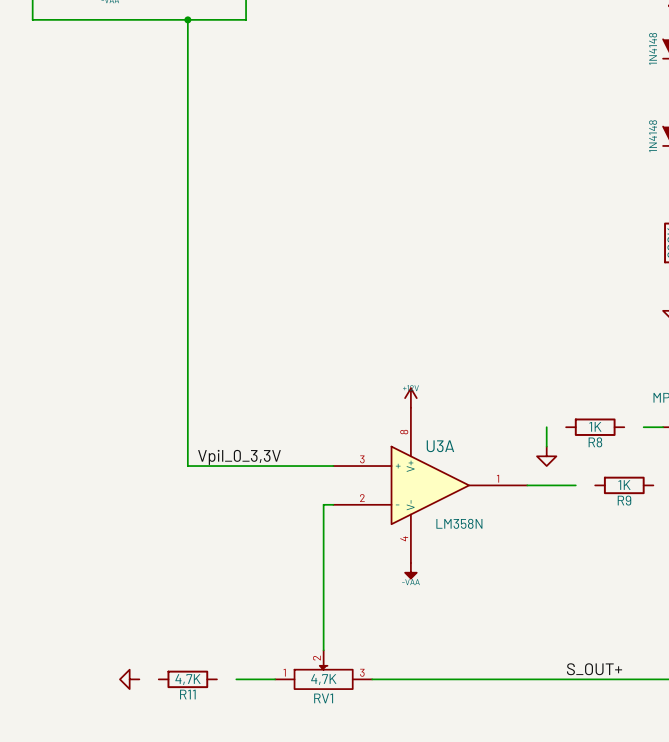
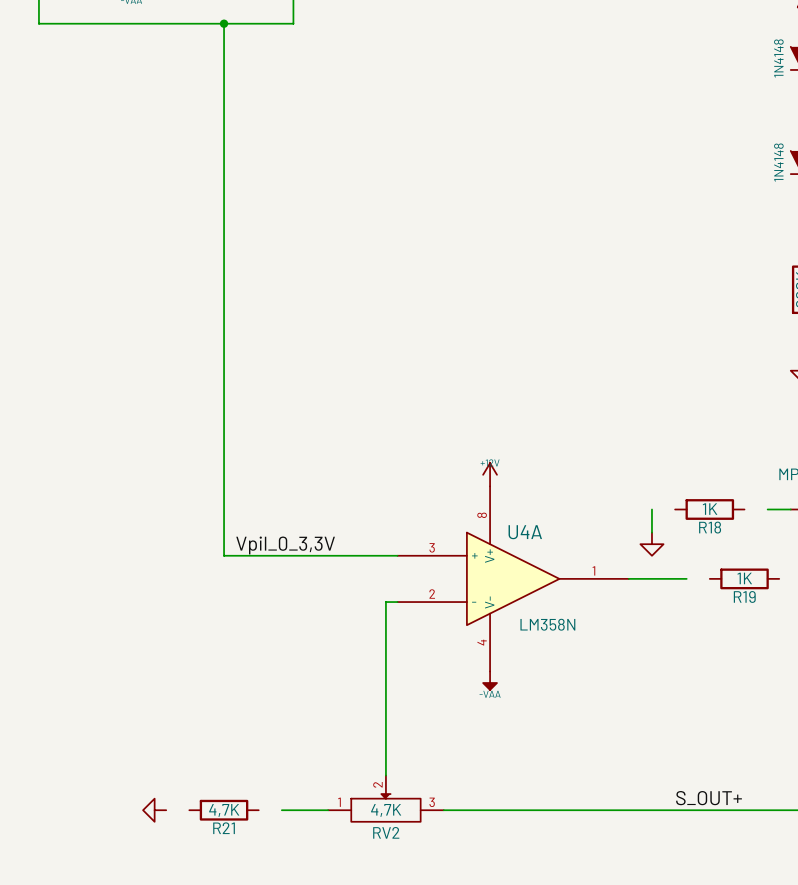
R8 name: R8 (595, 442) -> R18 (710, 527)
U3A name: U3A (440, 446) -> U4A (525, 532)
R9 name: R9 (624, 500) -> R19 (744, 596)
R11 name: R11 (187, 694) -> R21 (224, 828)
RV1 name: RV1 (323, 698) -> RV2 (386, 832)

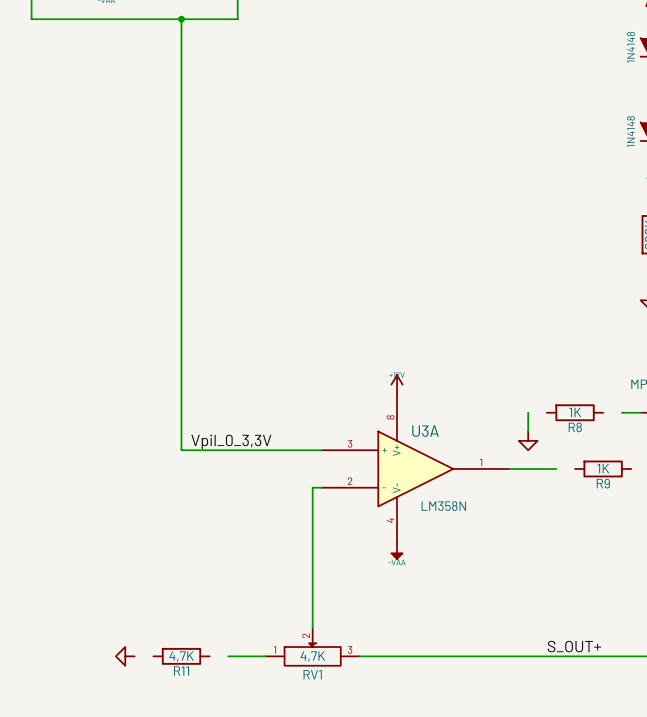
R18 name: R18 (710, 527) -> R8 (575, 427)
U4A name: U4A (525, 532) -> U3A (425, 431)
R19 name: R19 (744, 596) -> R9 (603, 483)
R21 name: R21 (224, 828) -> R11 (181, 671)
RV2 name: RV2 (386, 832) -> RV1 (312, 674)

